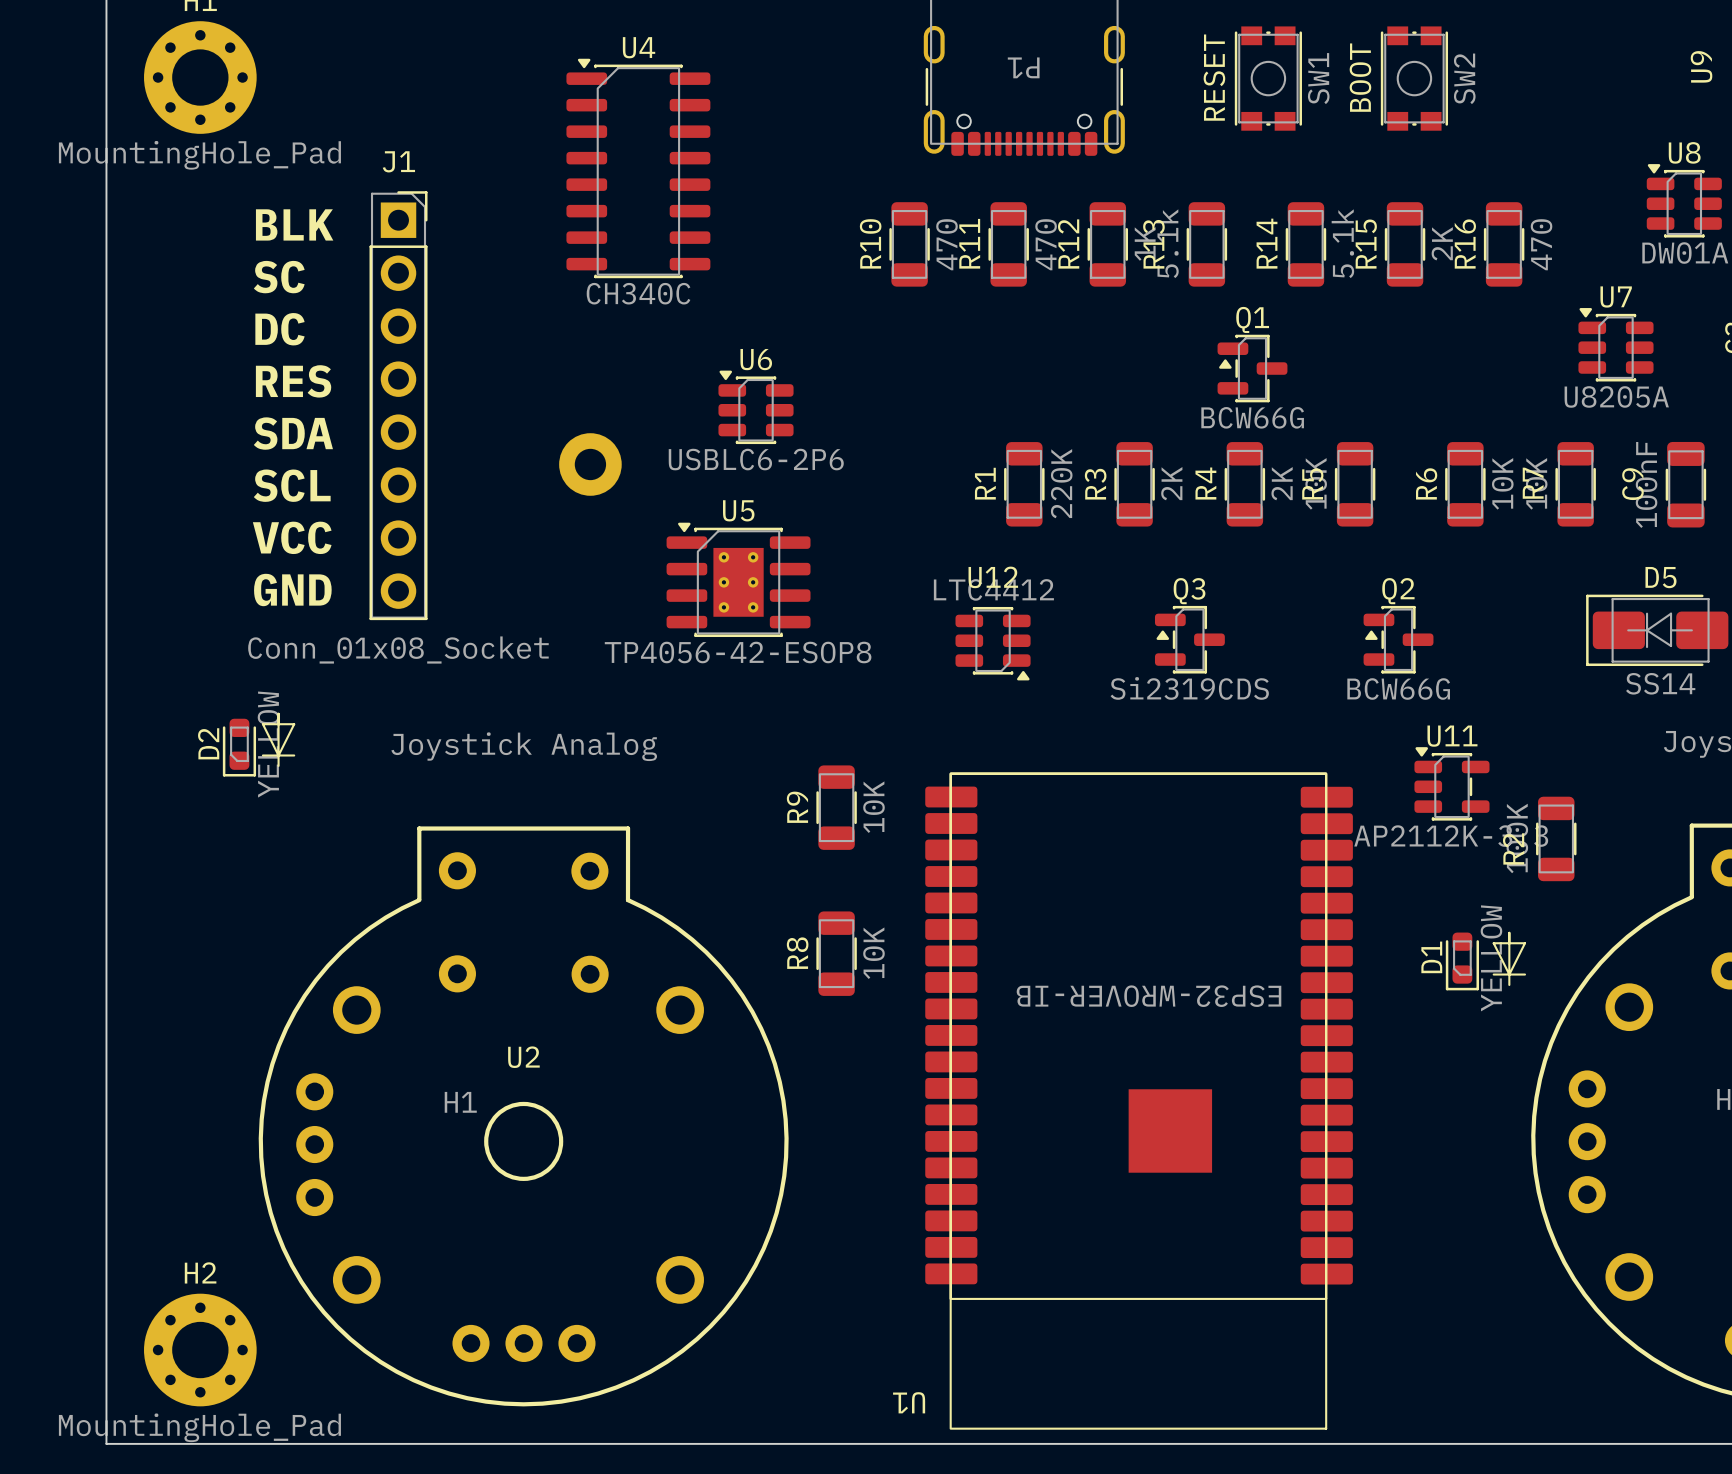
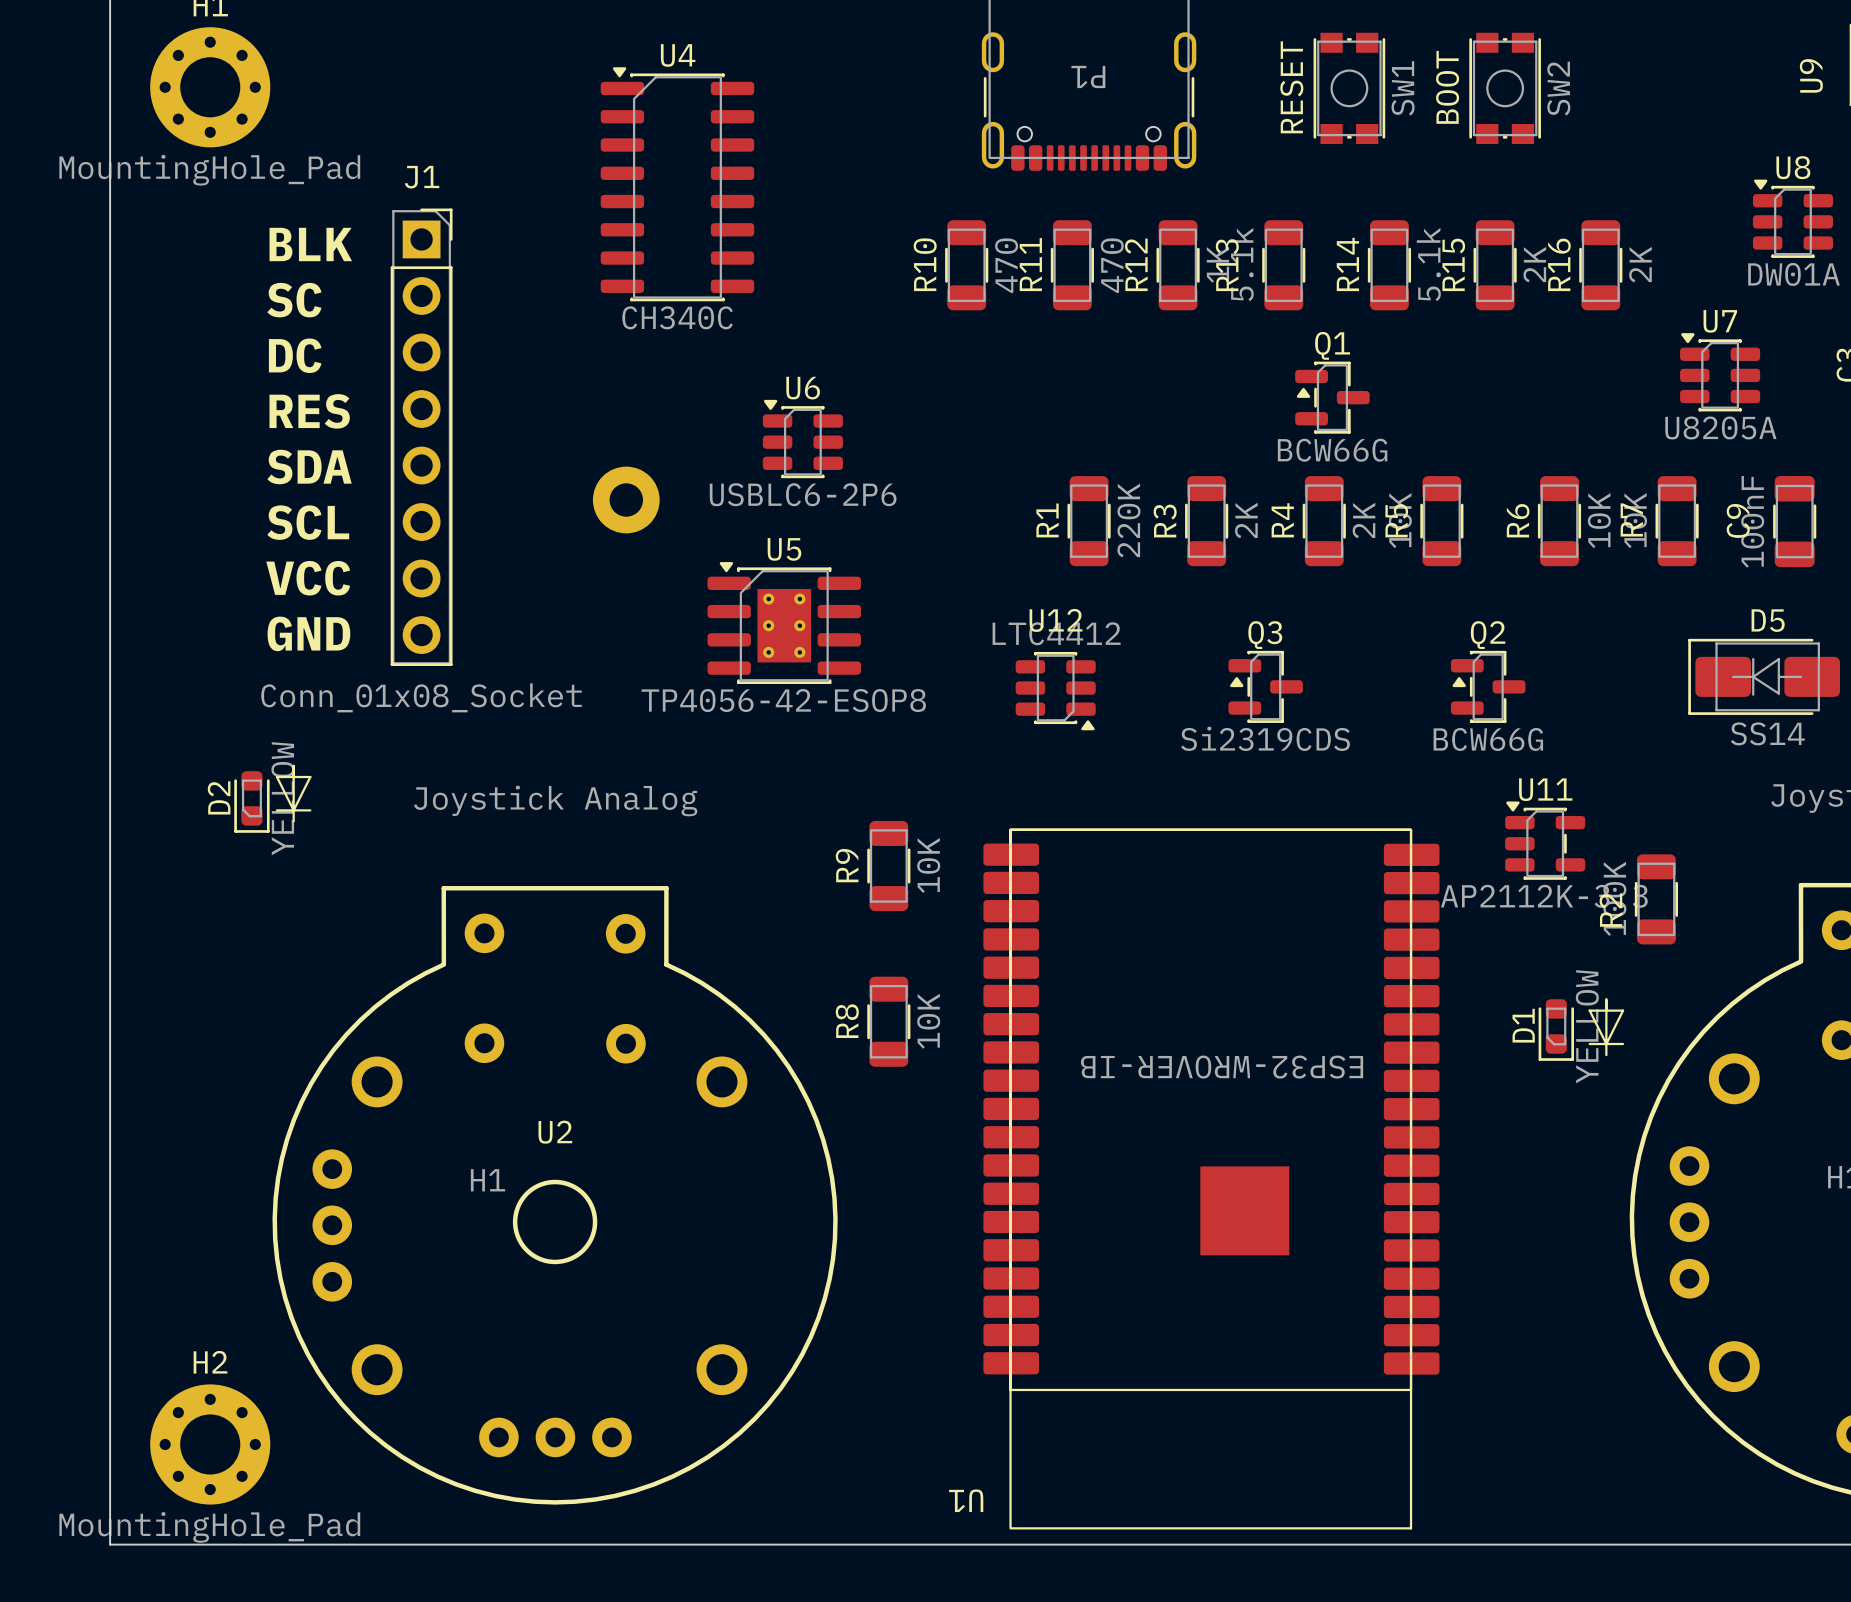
R16 value: 470 (1541, 244) -> 2K (1640, 264)

